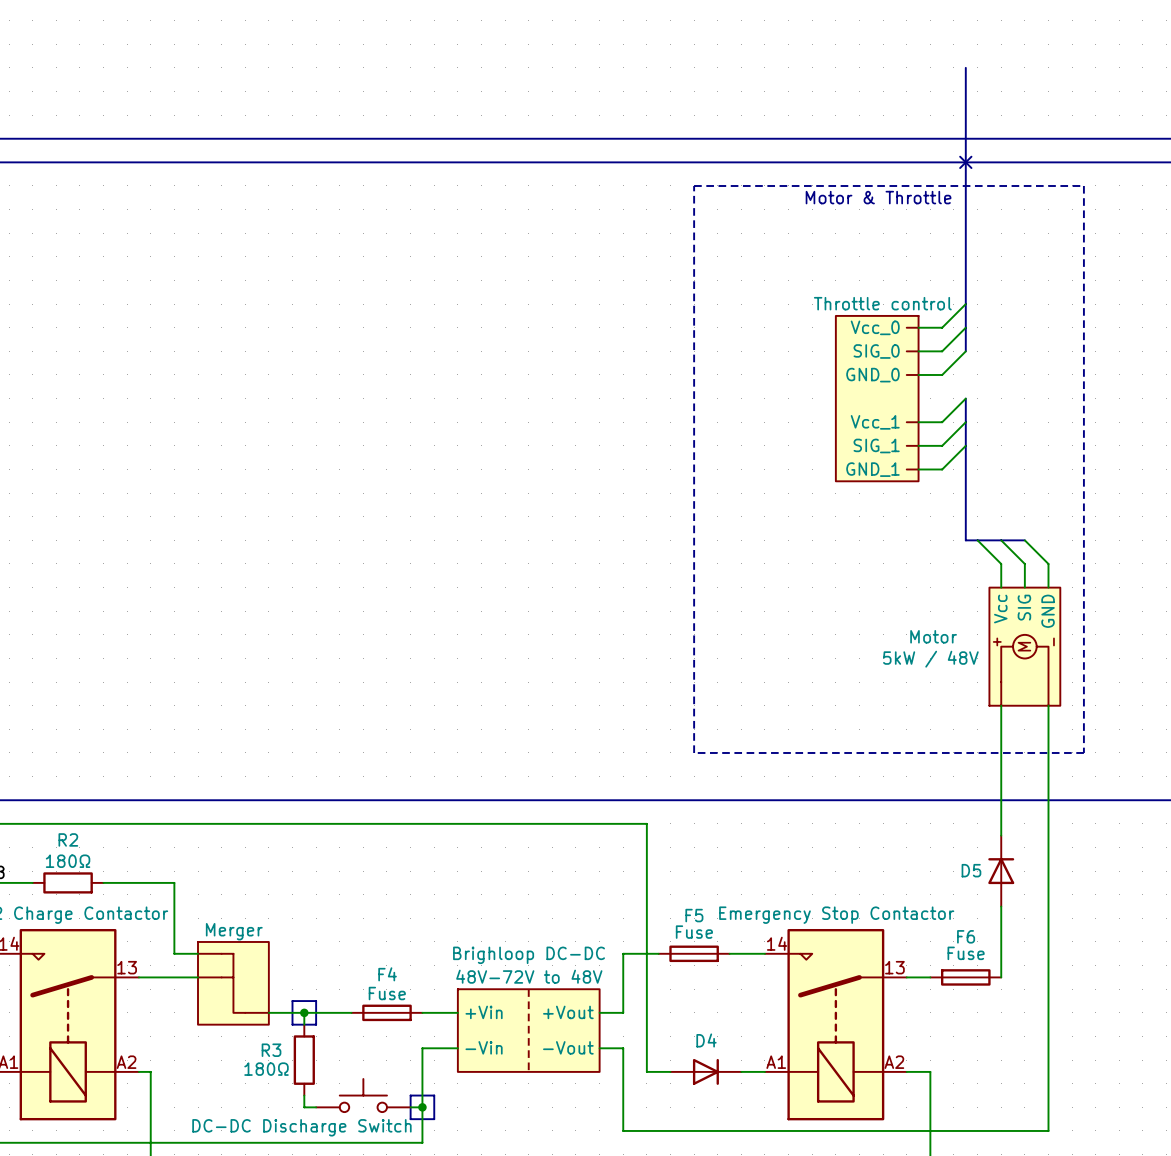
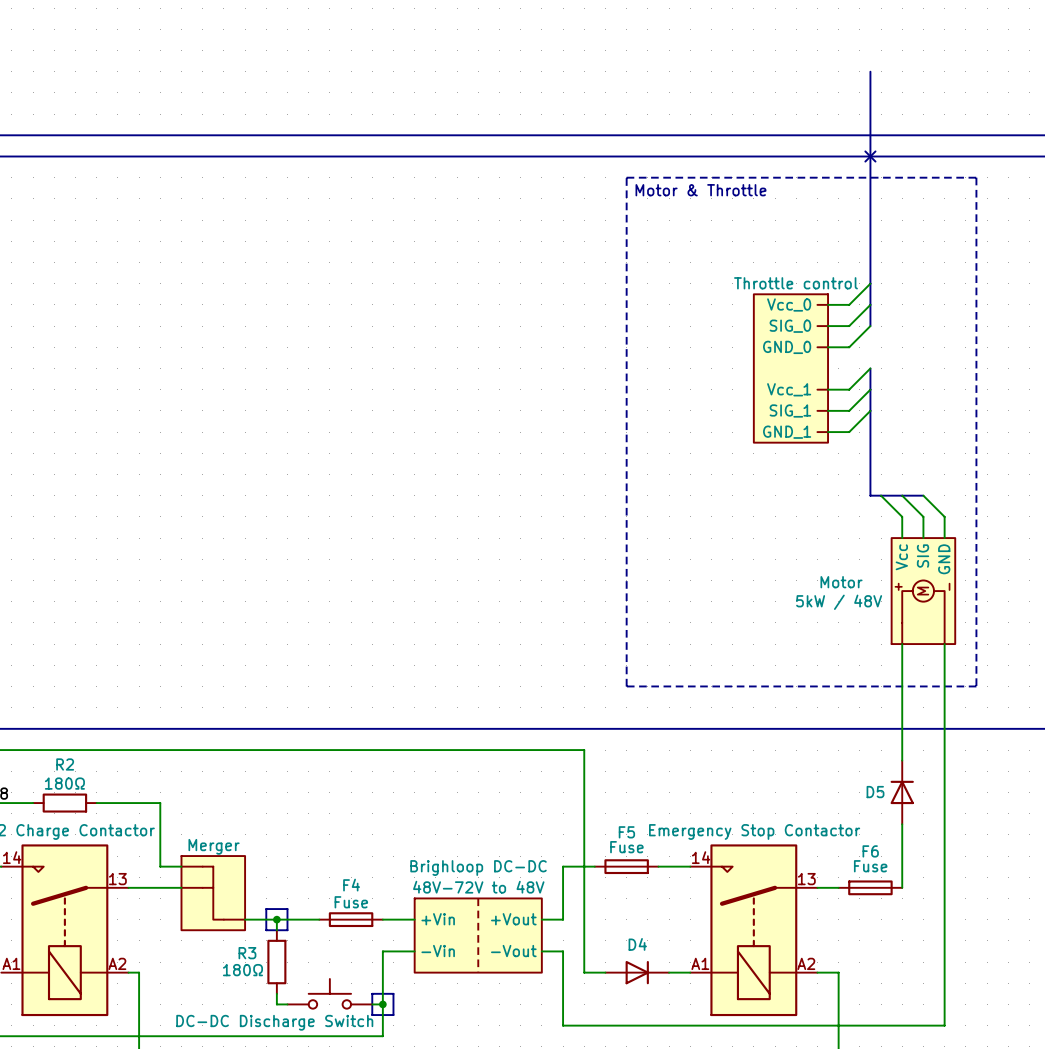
text position: Motor & Throttle (878, 197) -> Motor & Throttle (700, 190)

